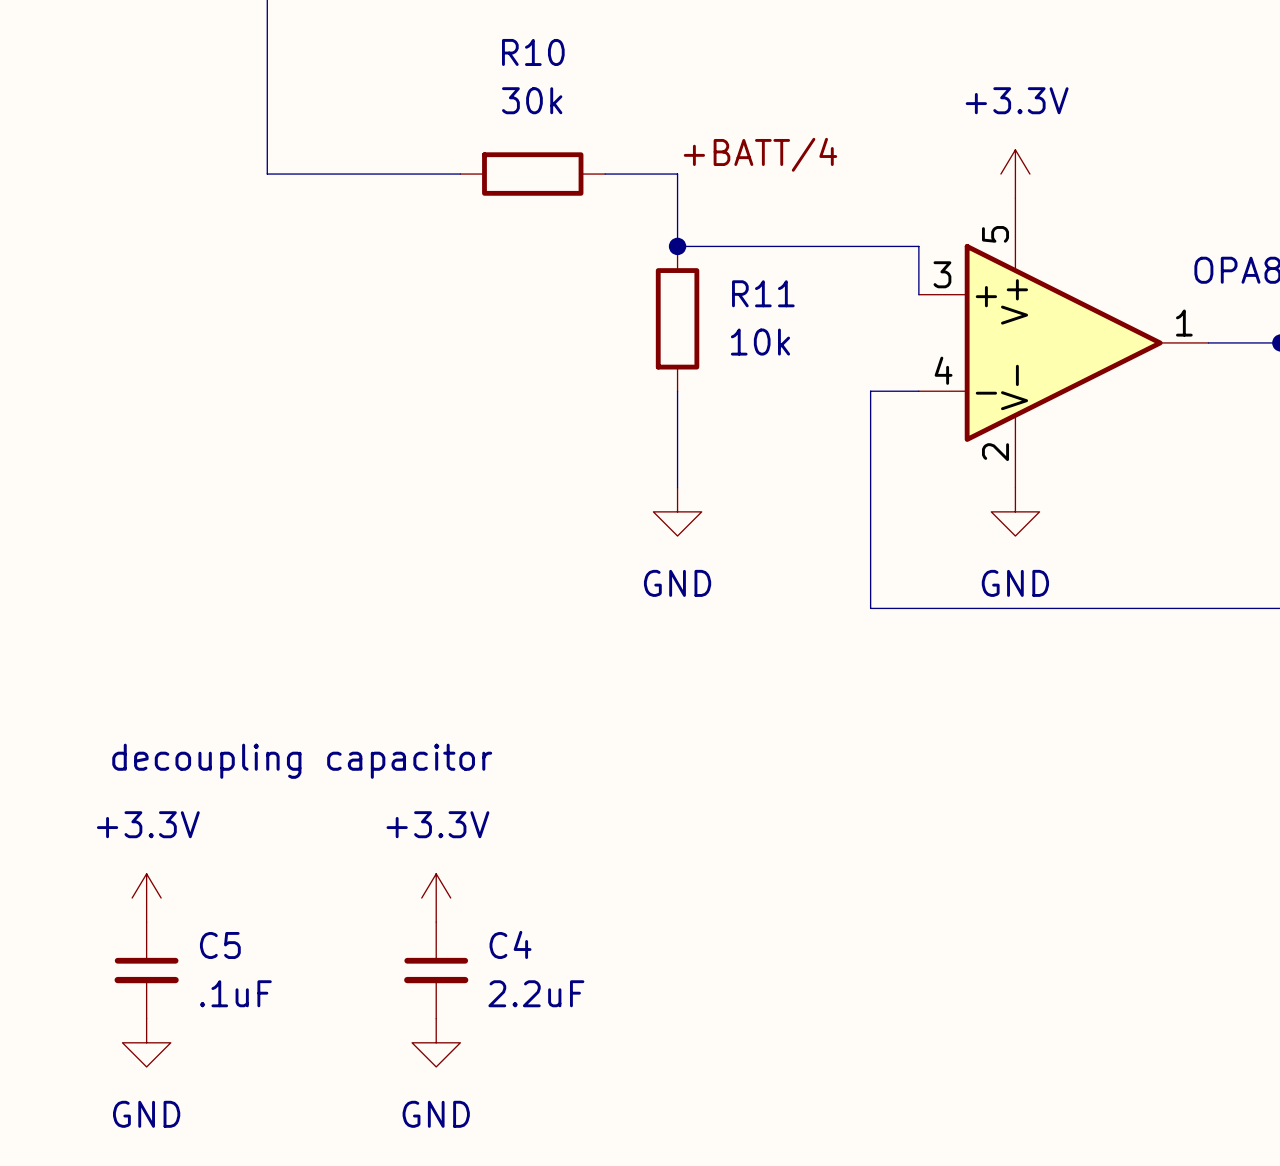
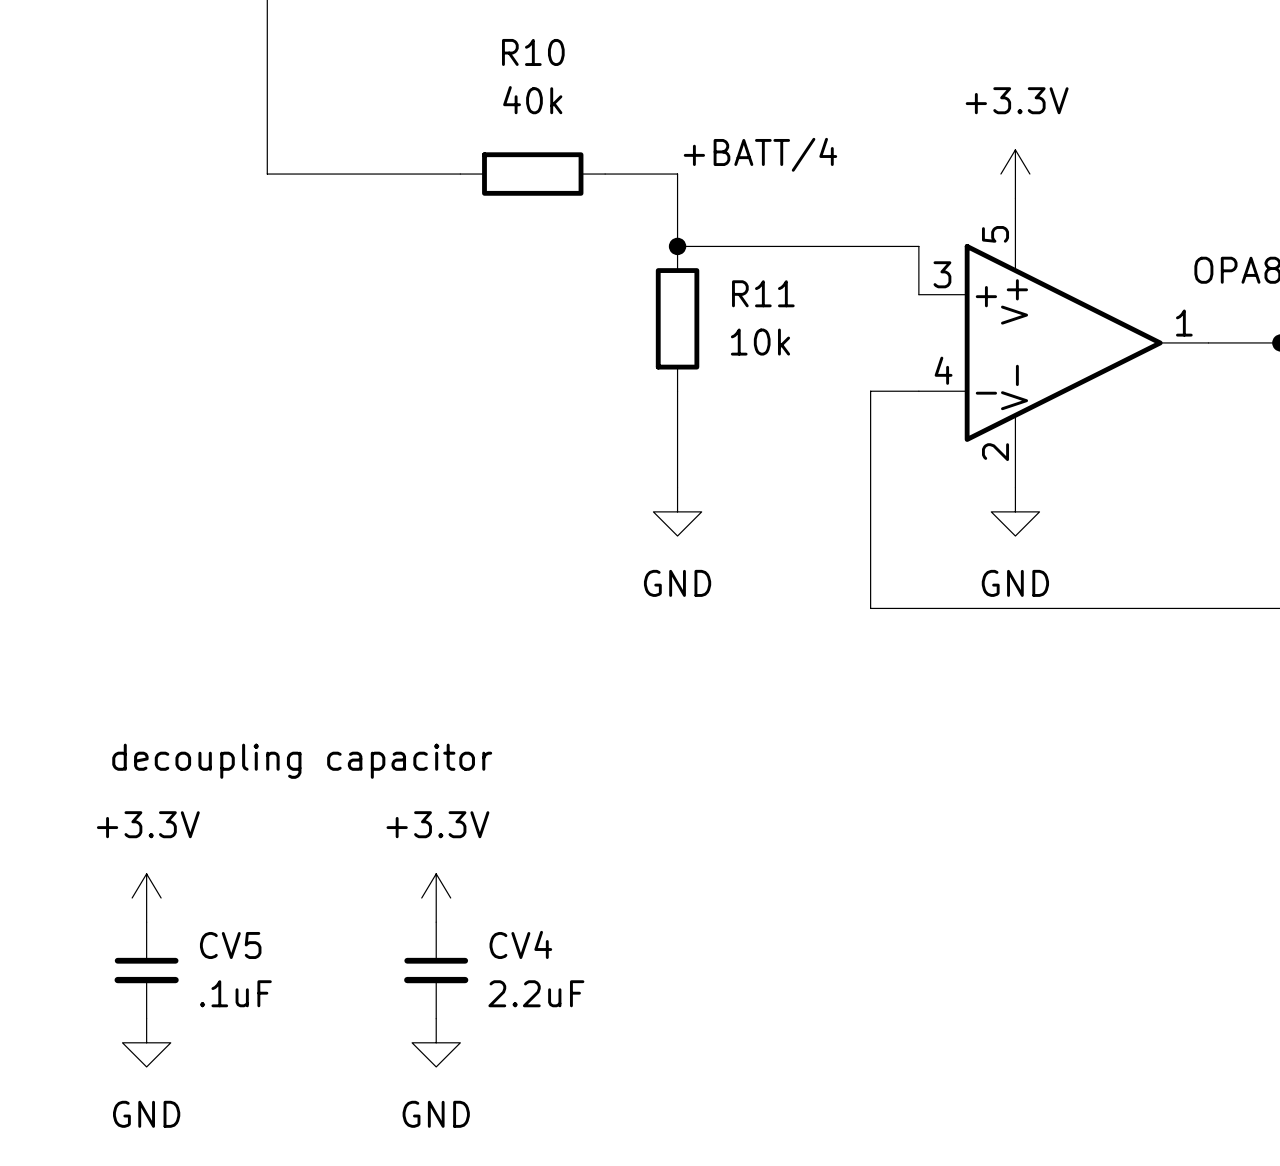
R10 value: 30k (532, 100) -> 40k (532, 100)
C4 name: C4 (510, 944) -> CV4 (520, 944)
C5 name: C5 (220, 945) -> CV5 (230, 945)

